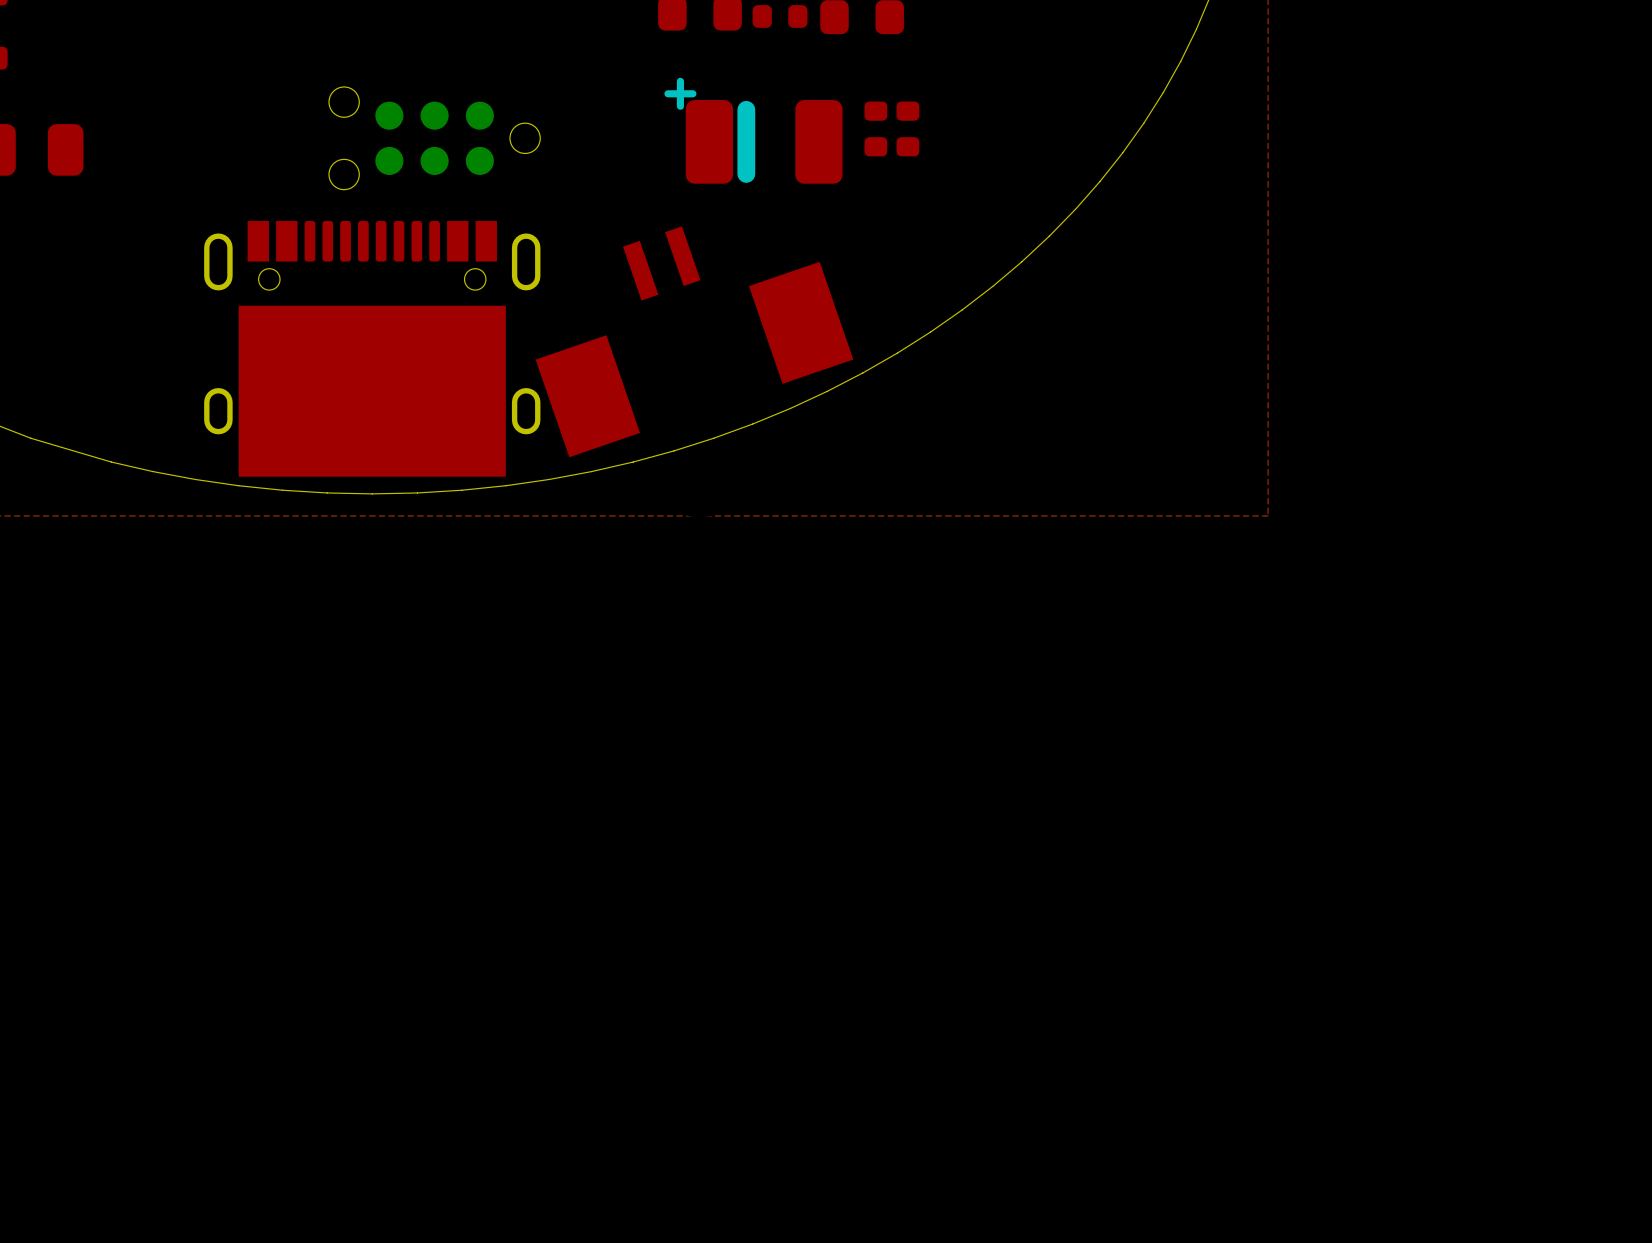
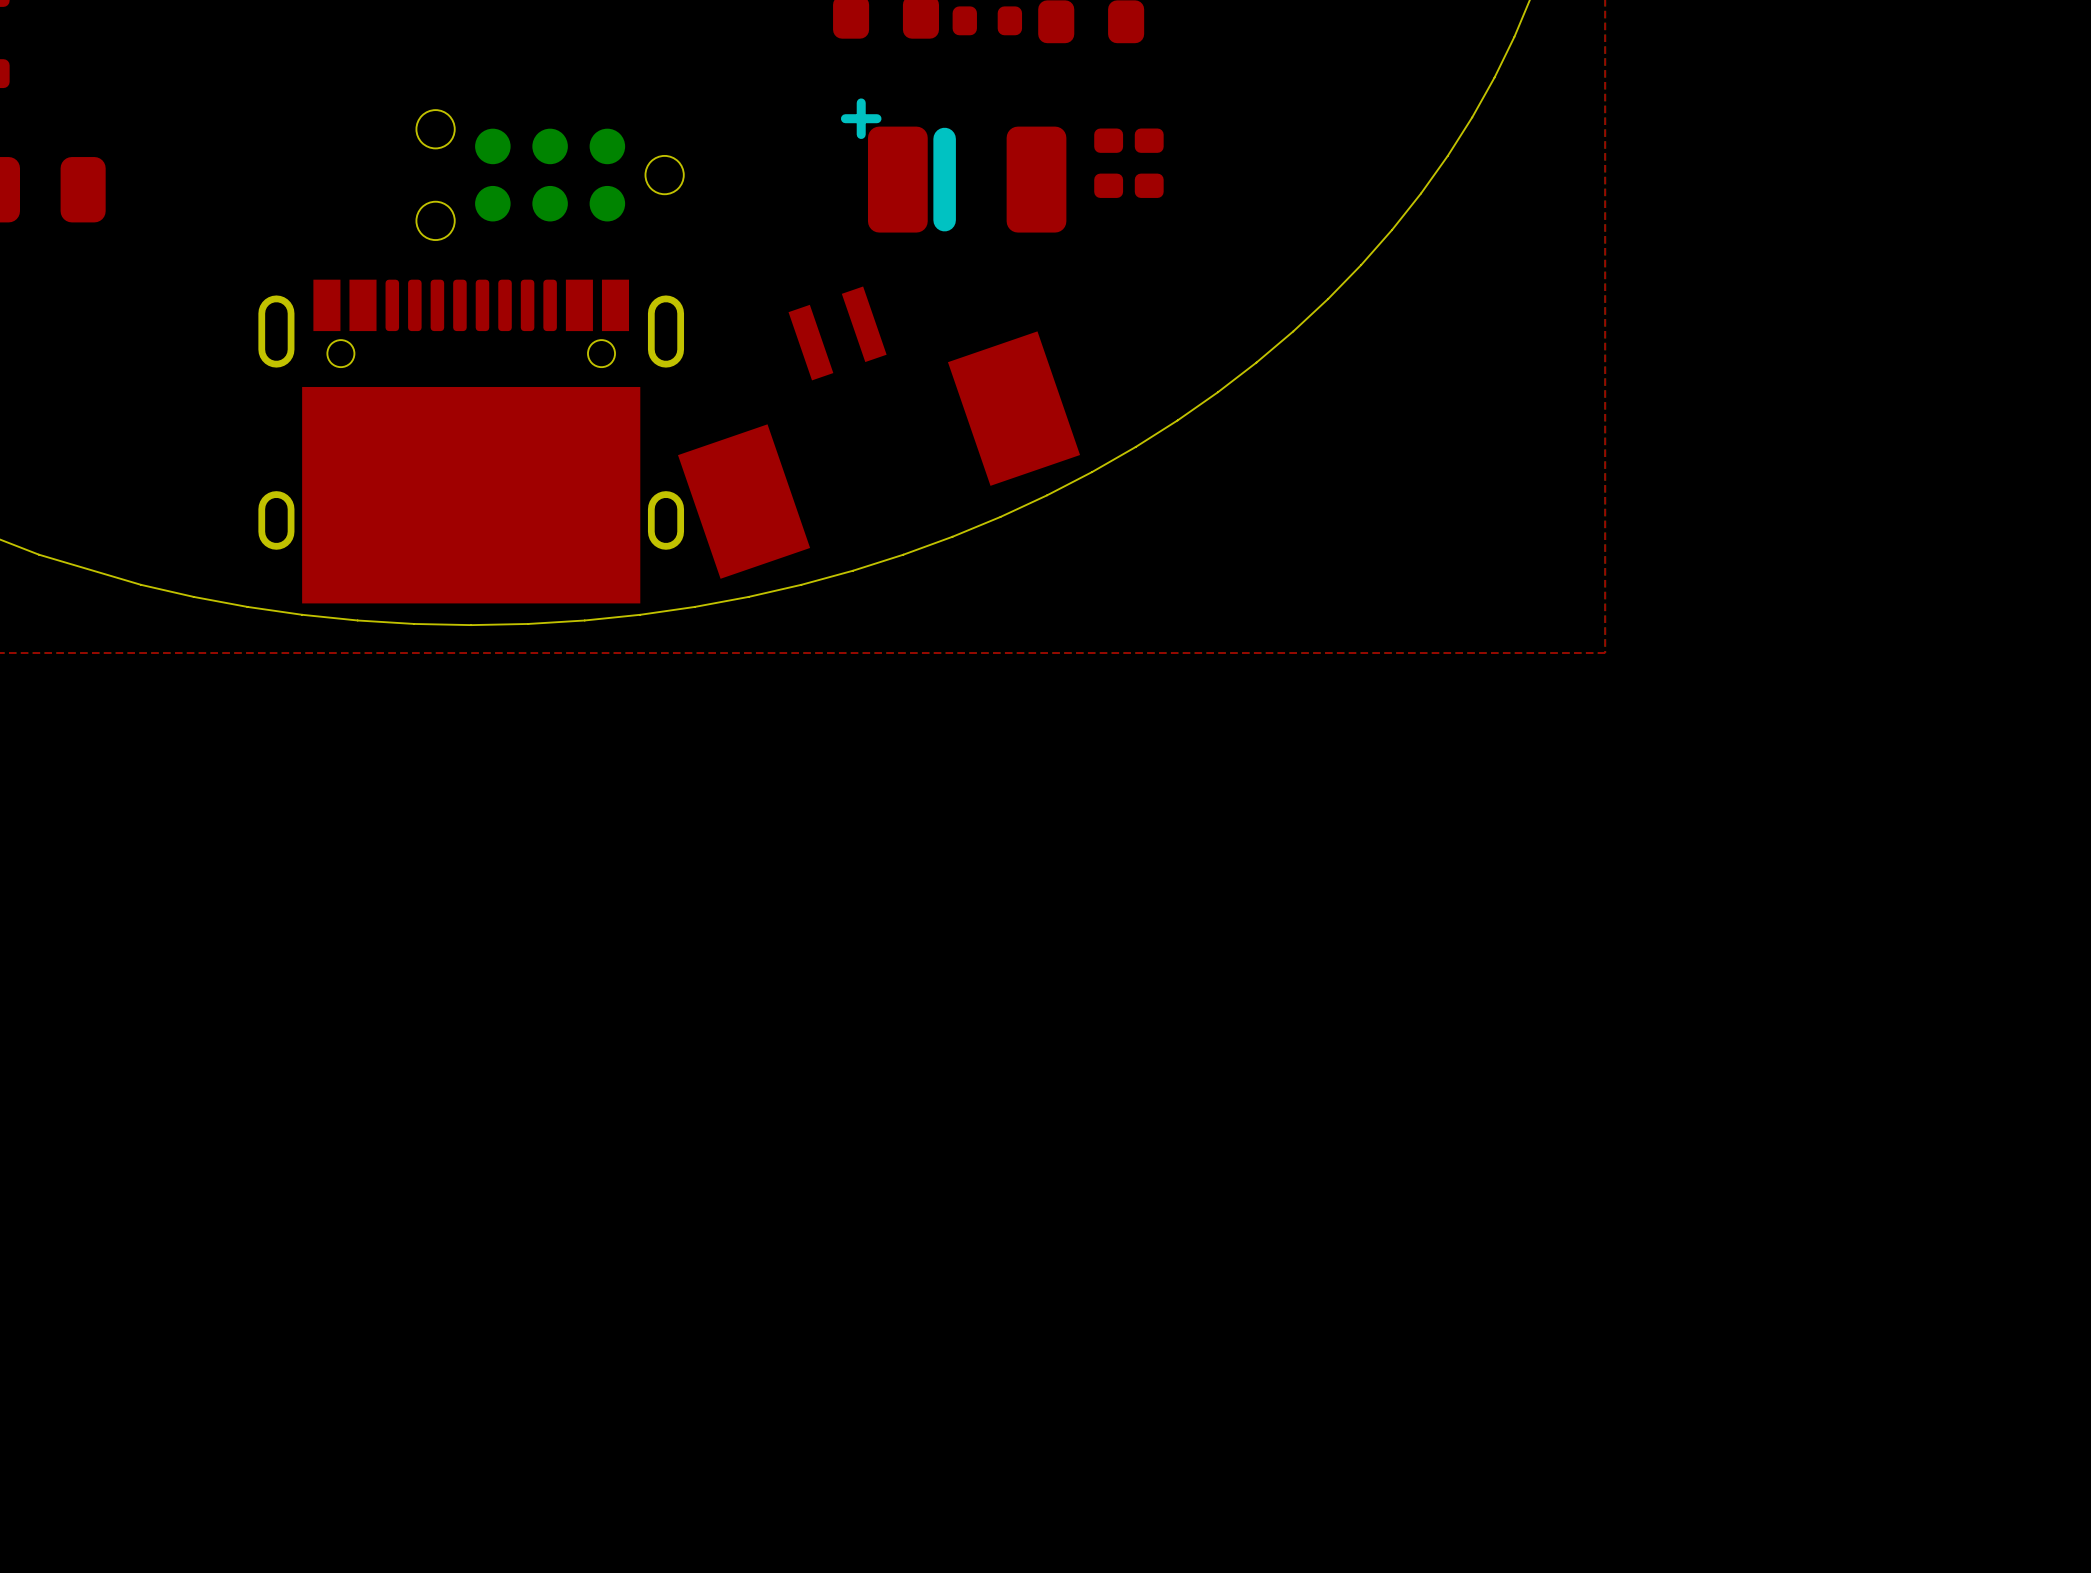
part footprint: [535, 226, 854, 518] -> [678, 286, 1081, 579]

